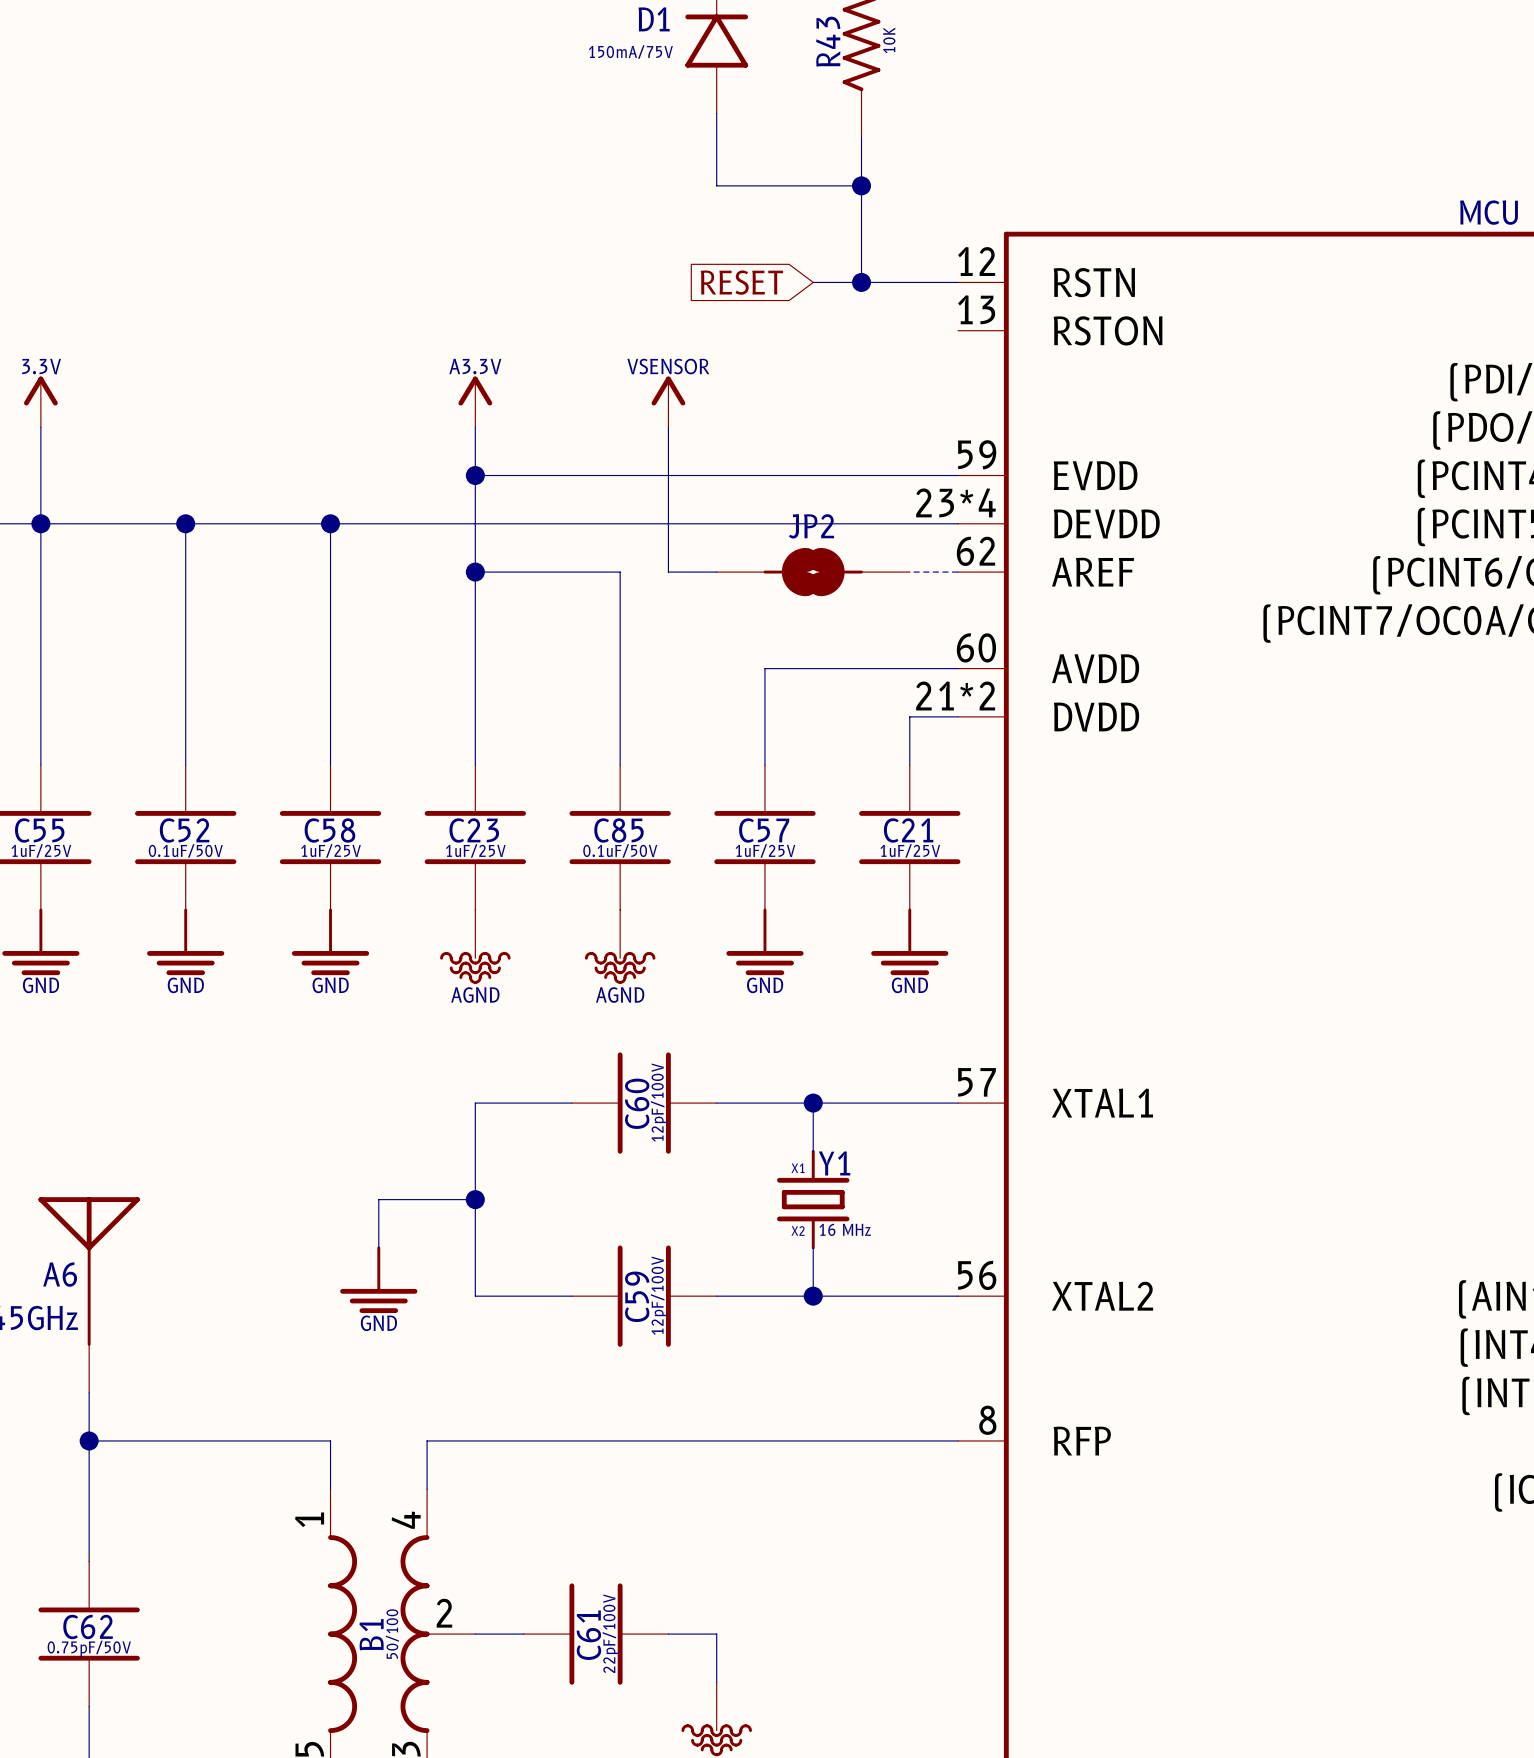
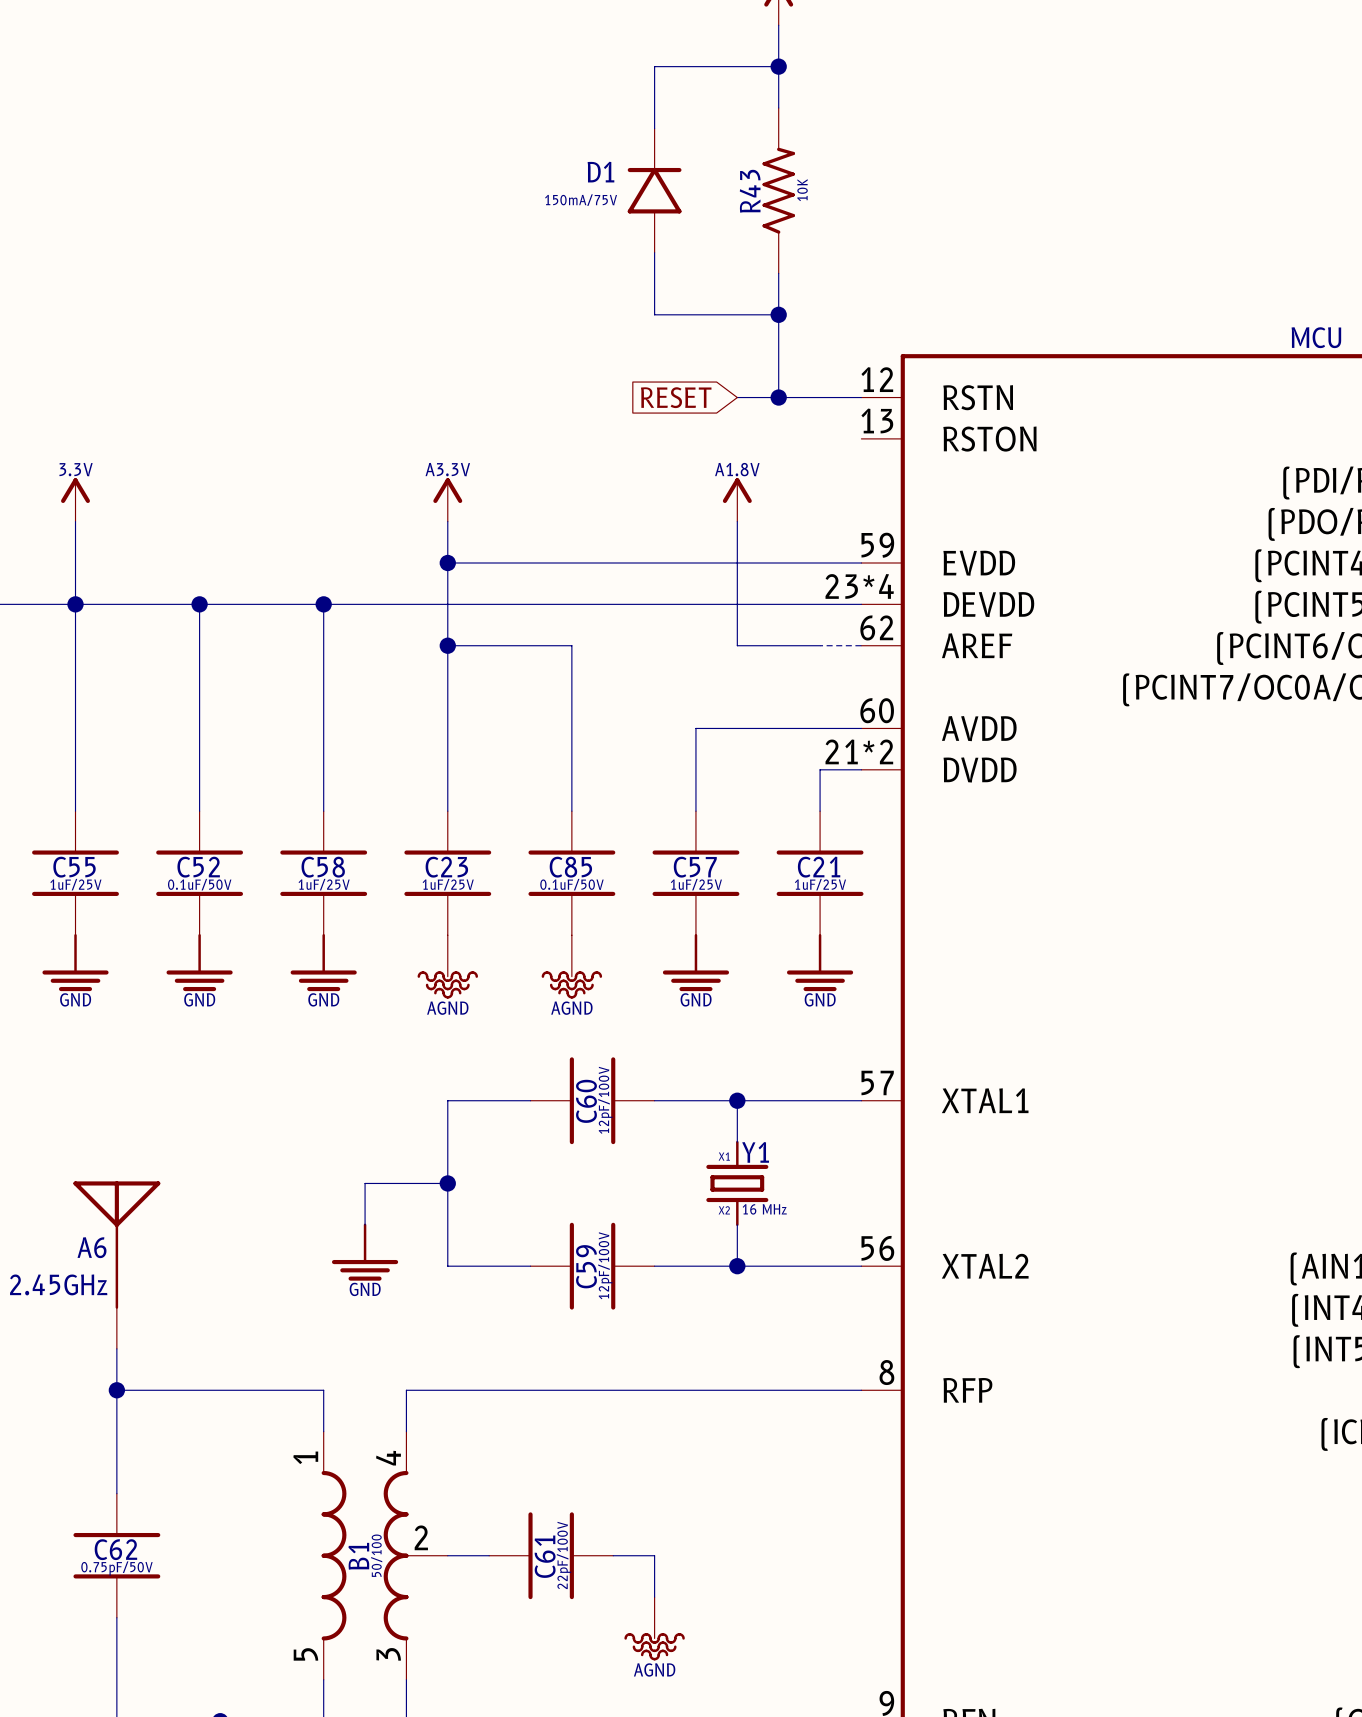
power symbol: (668, 401) -> none
power symbol: none -> (737, 499)
wire: (668, 427) (668, 572) (716, 572) -> none
wire: none -> (737, 521) (737, 645) (820, 645)
JP2: (813, 572) -> none

